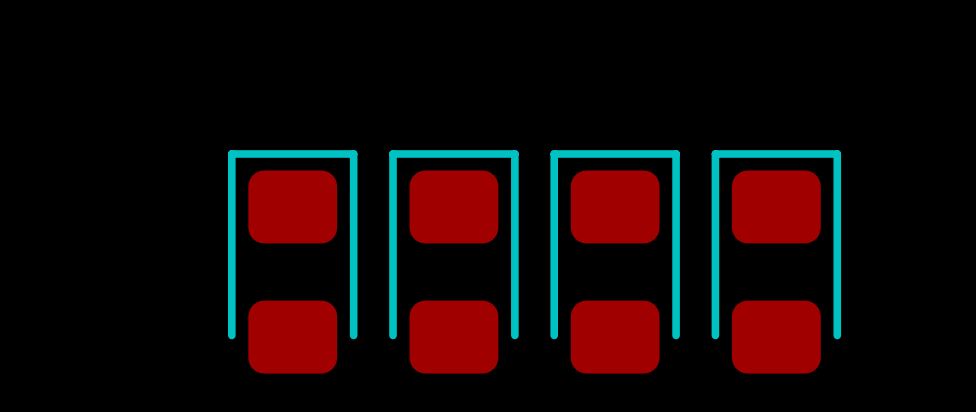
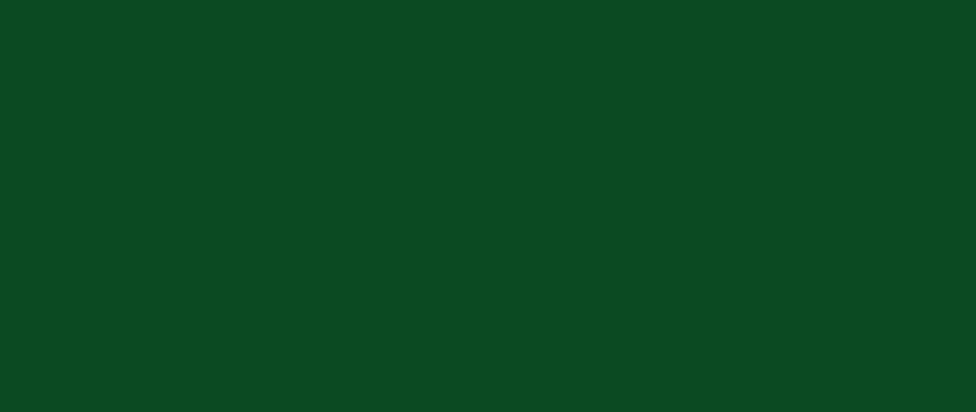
part: (292, 261) -> none
part: (453, 261) -> none
part: (615, 261) -> none
part: (776, 261) -> none

